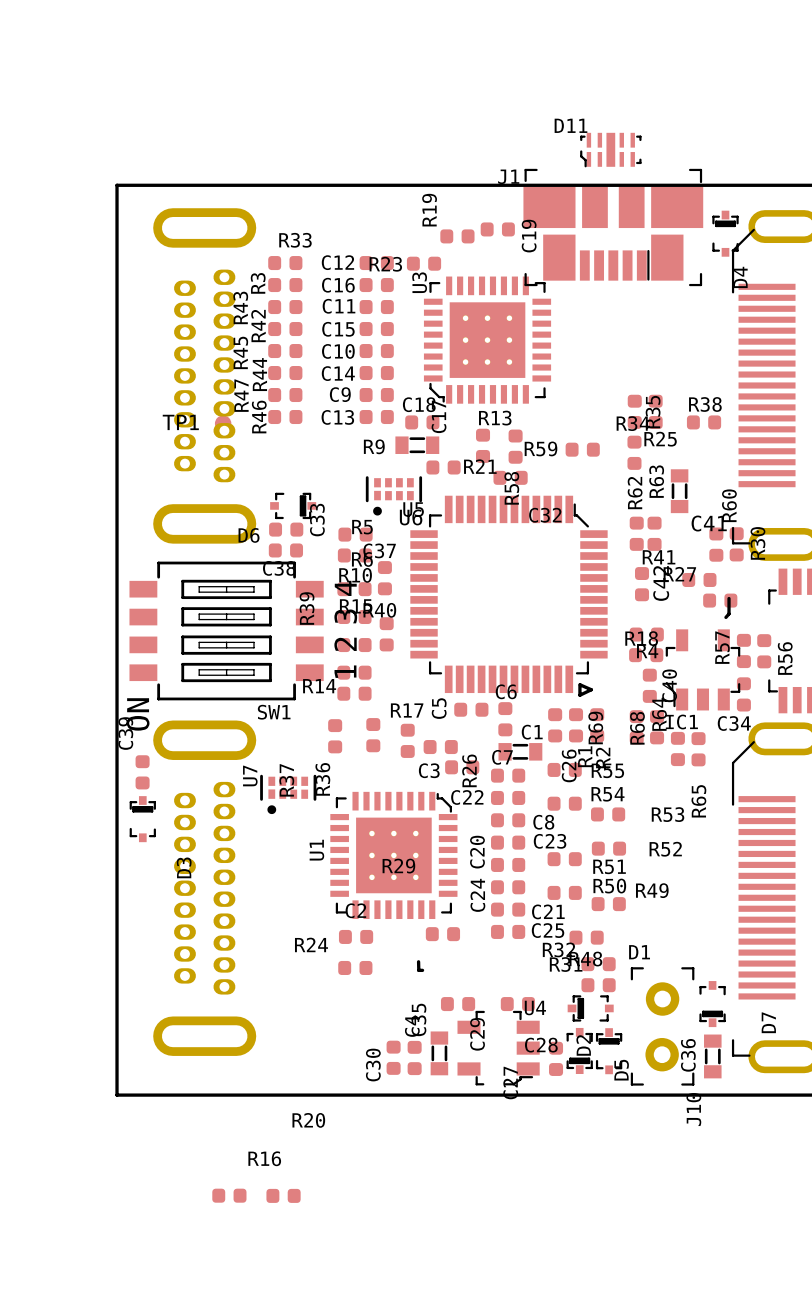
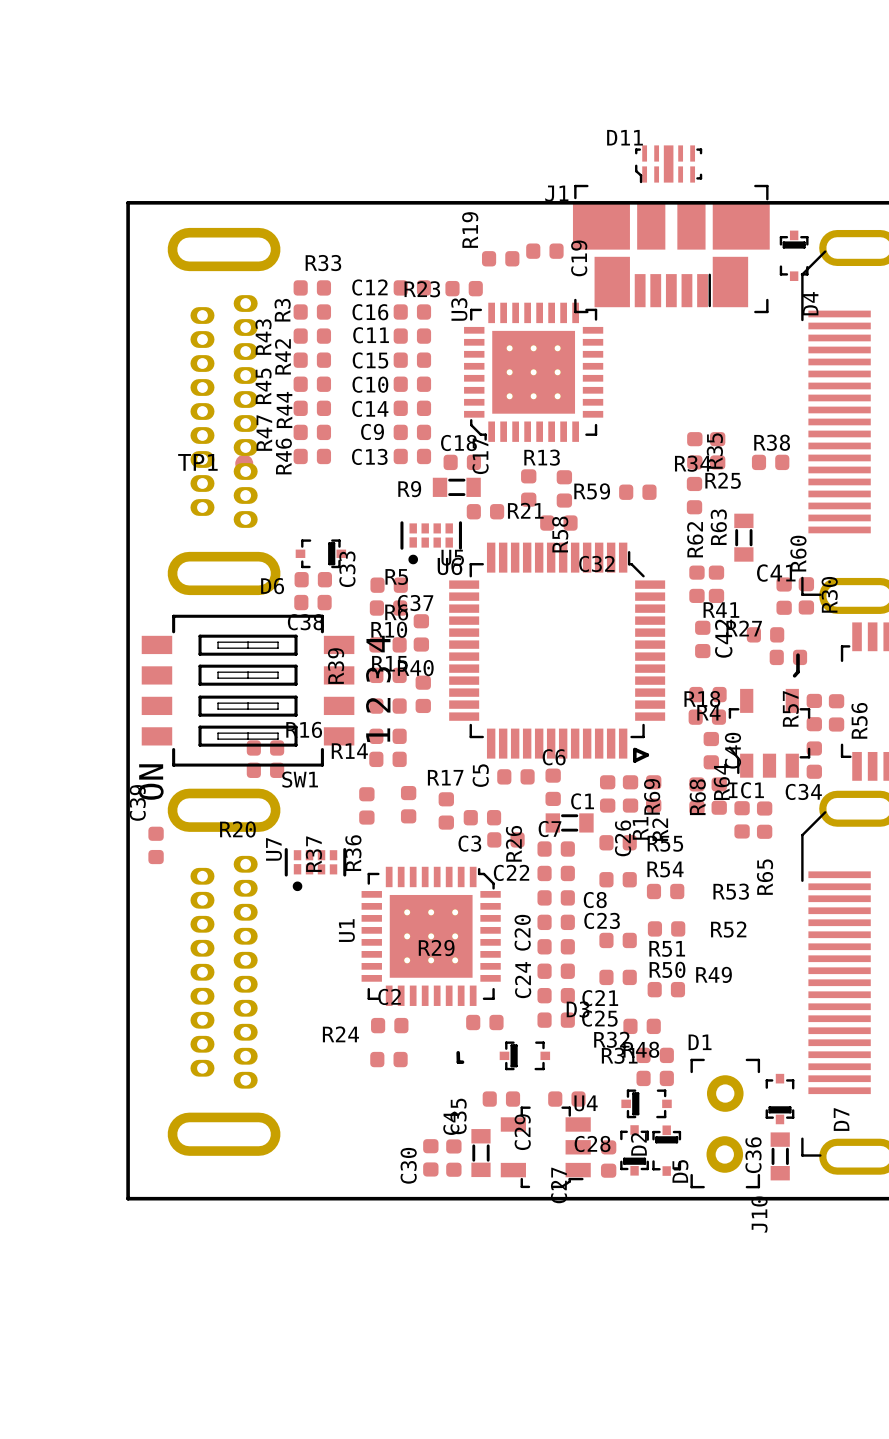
D3 rotation: 0° (142, 819) -> 90° counterclockwise (524, 1055)
D3 position: (142, 819) -> (524, 1055)
R20 name position: R20 (308, 1120) -> R20 (237, 829)
R16 position: (229, 1195) -> (265, 770)
R20 position: (283, 1195) -> (265, 747)

